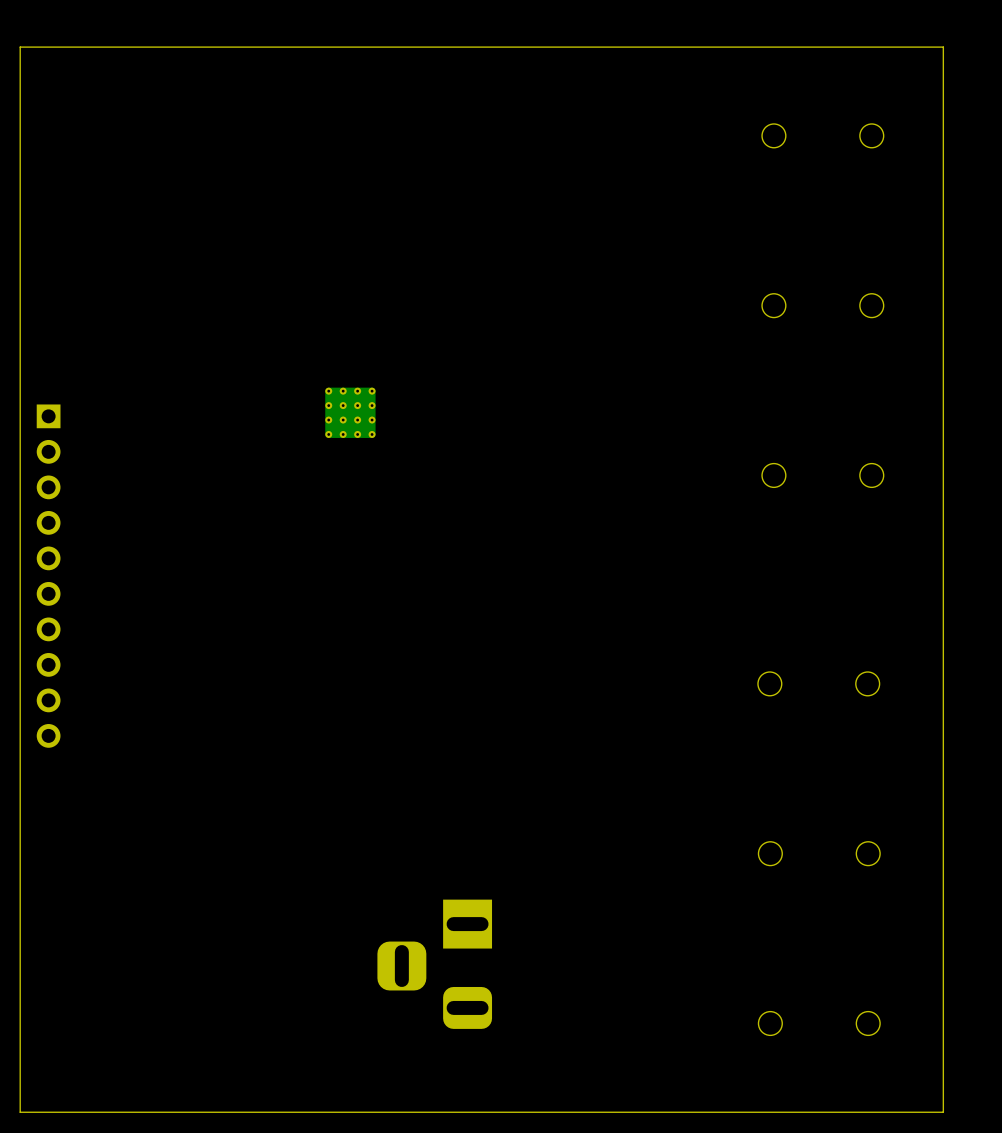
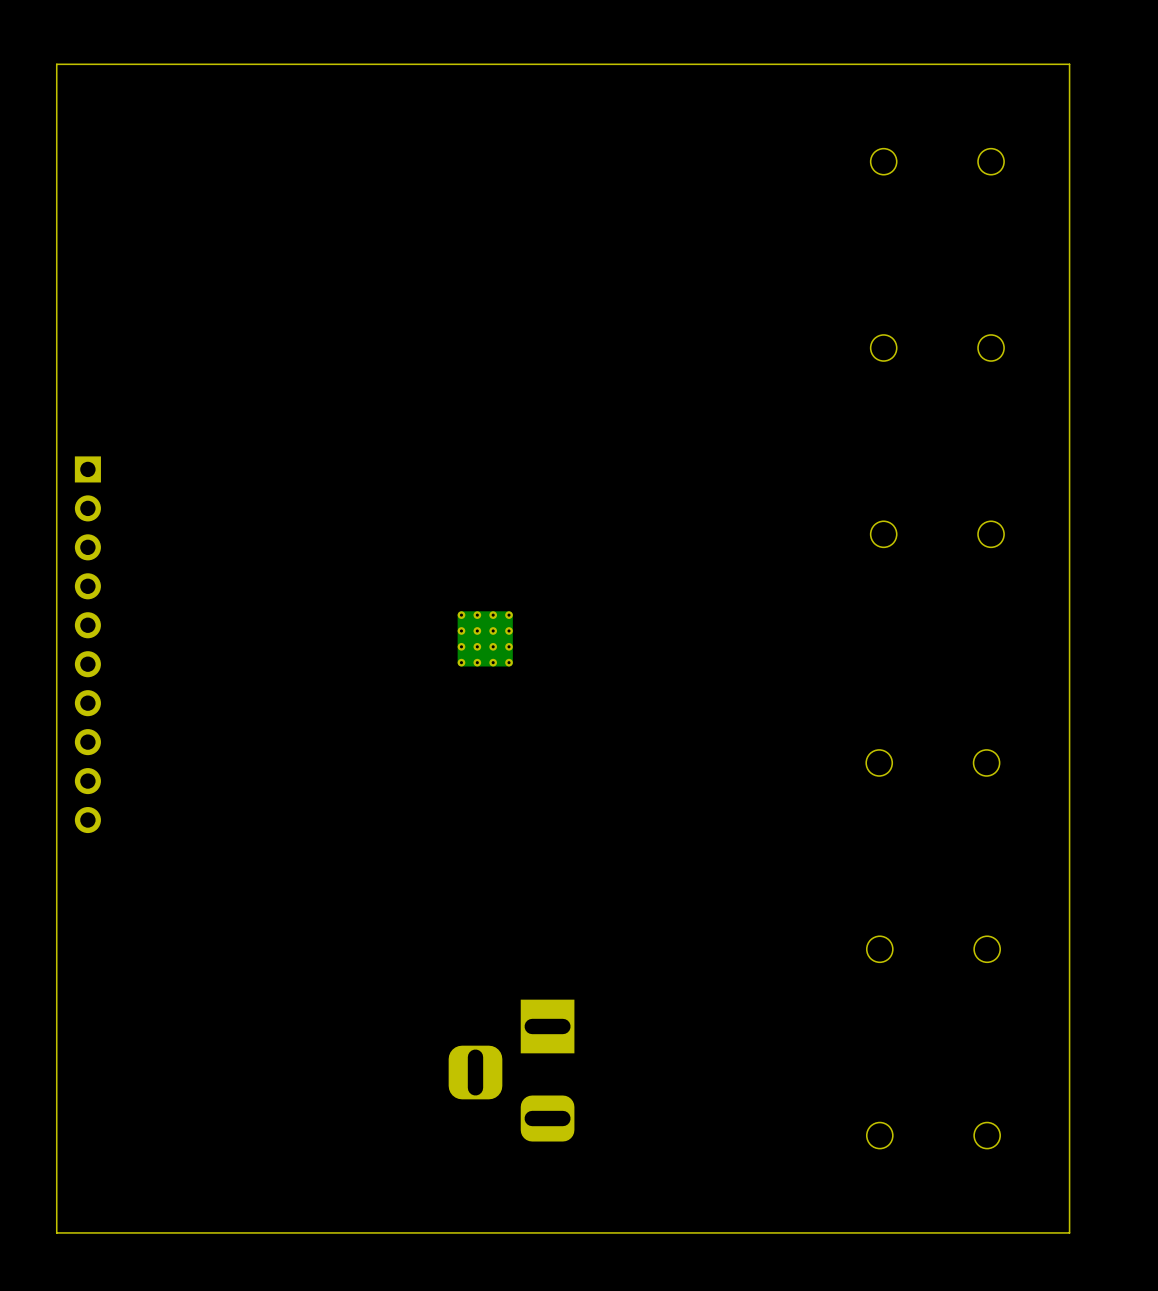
part position: (350, 412) -> (485, 638)

